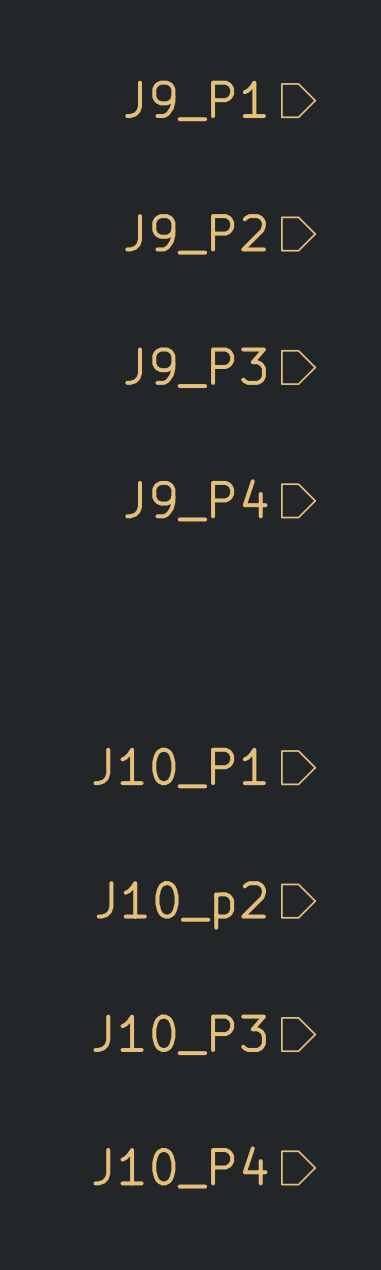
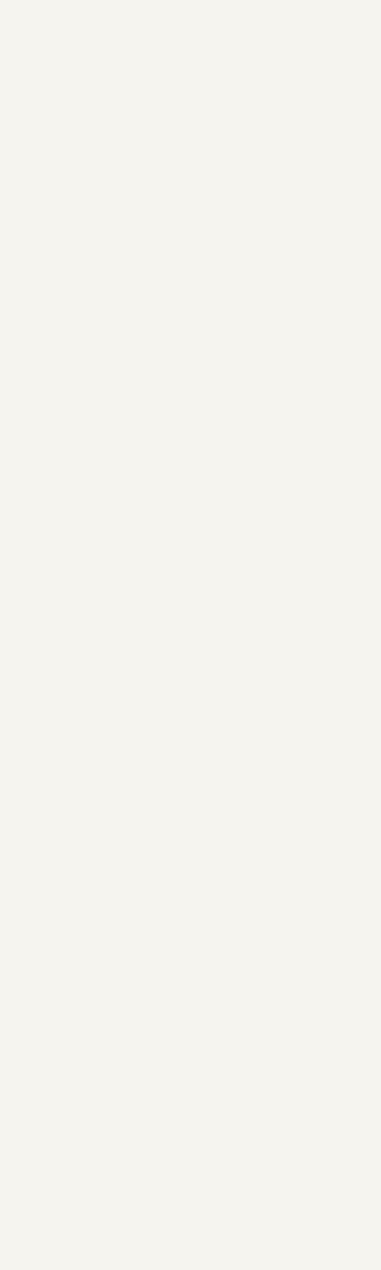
hierarchical label: J9_P1 (195, 100) -> none
hierarchical label: J9_P2 (195, 234) -> none
hierarchical label: J9_P3 (195, 367) -> none
hierarchical label: J9_P4 (196, 500) -> none
hierarchical label: J10_P1 (179, 768) -> none
hierarchical label: J10_p2 (181, 905) -> none
hierarchical label: J10_P3 (179, 1034) -> none
hierarchical label: J10_P4 (180, 1167) -> none

